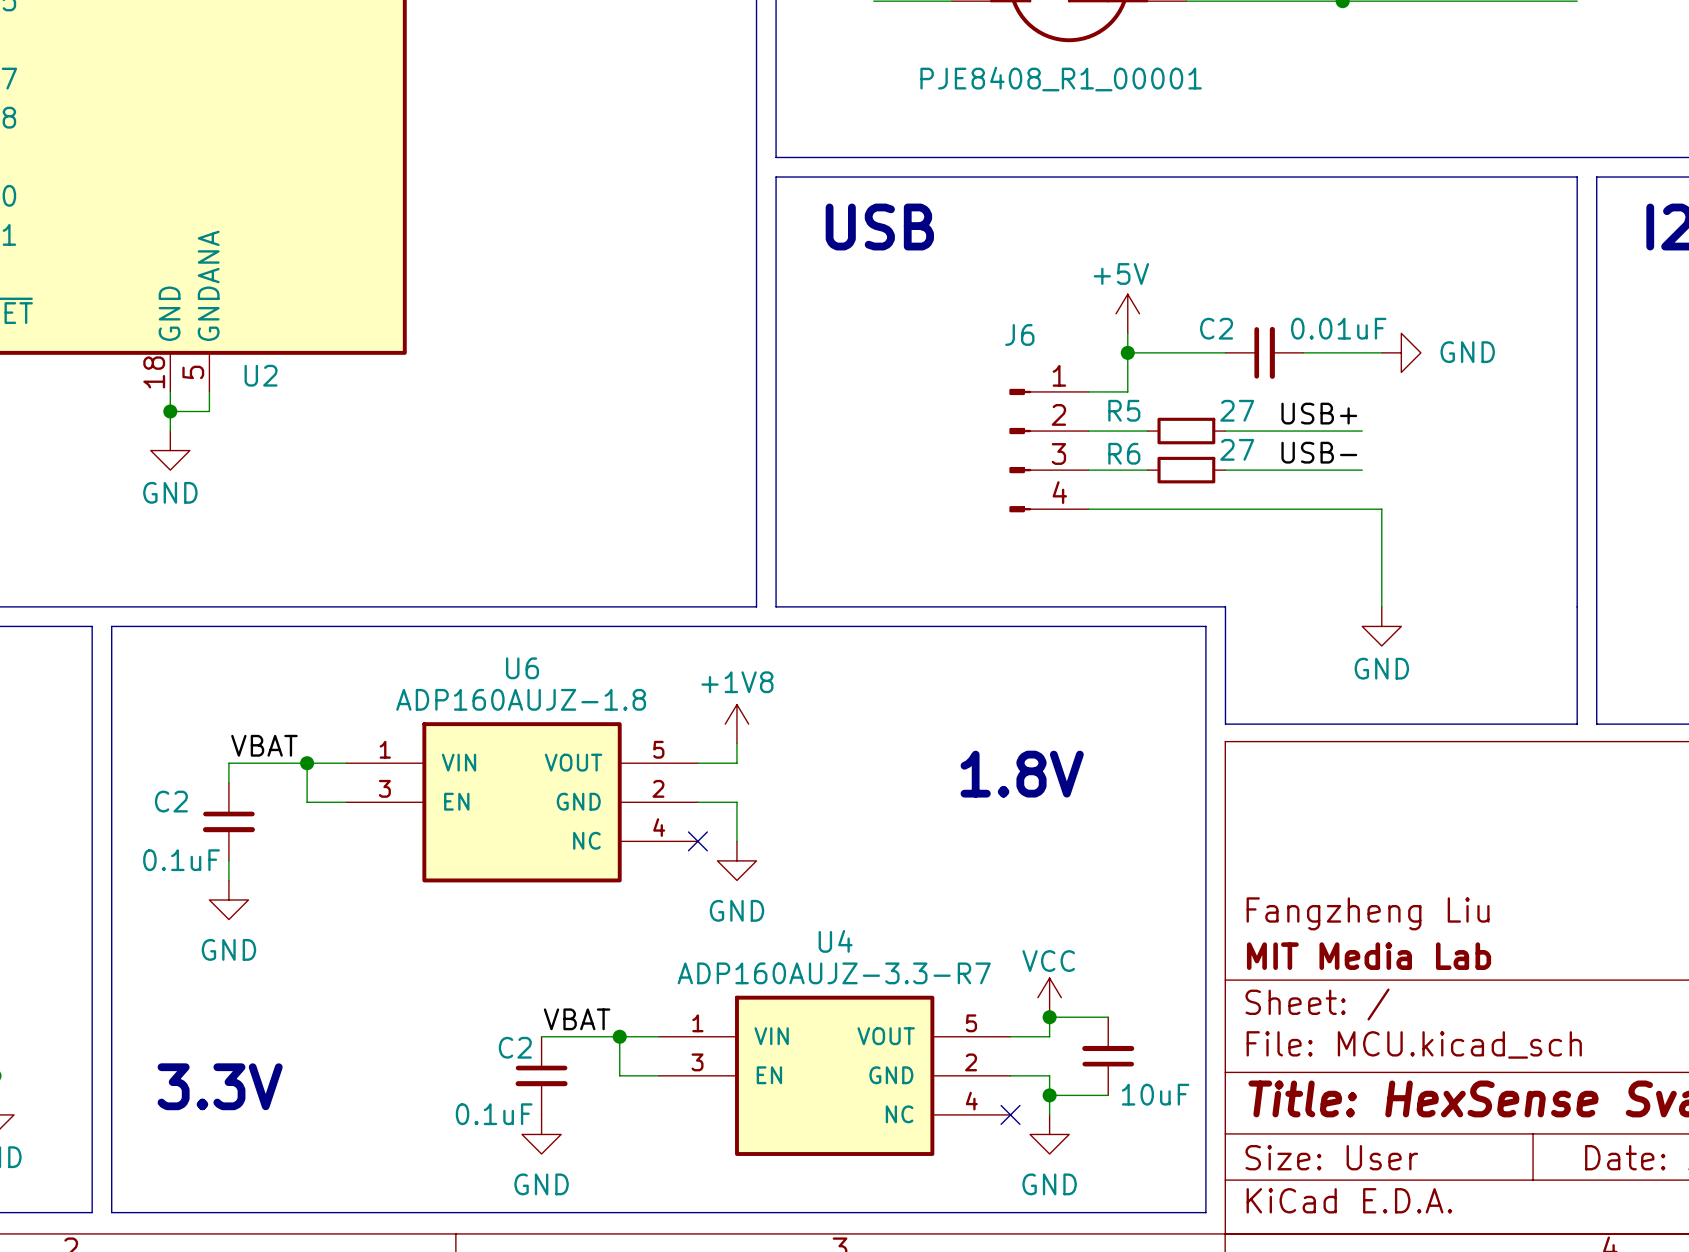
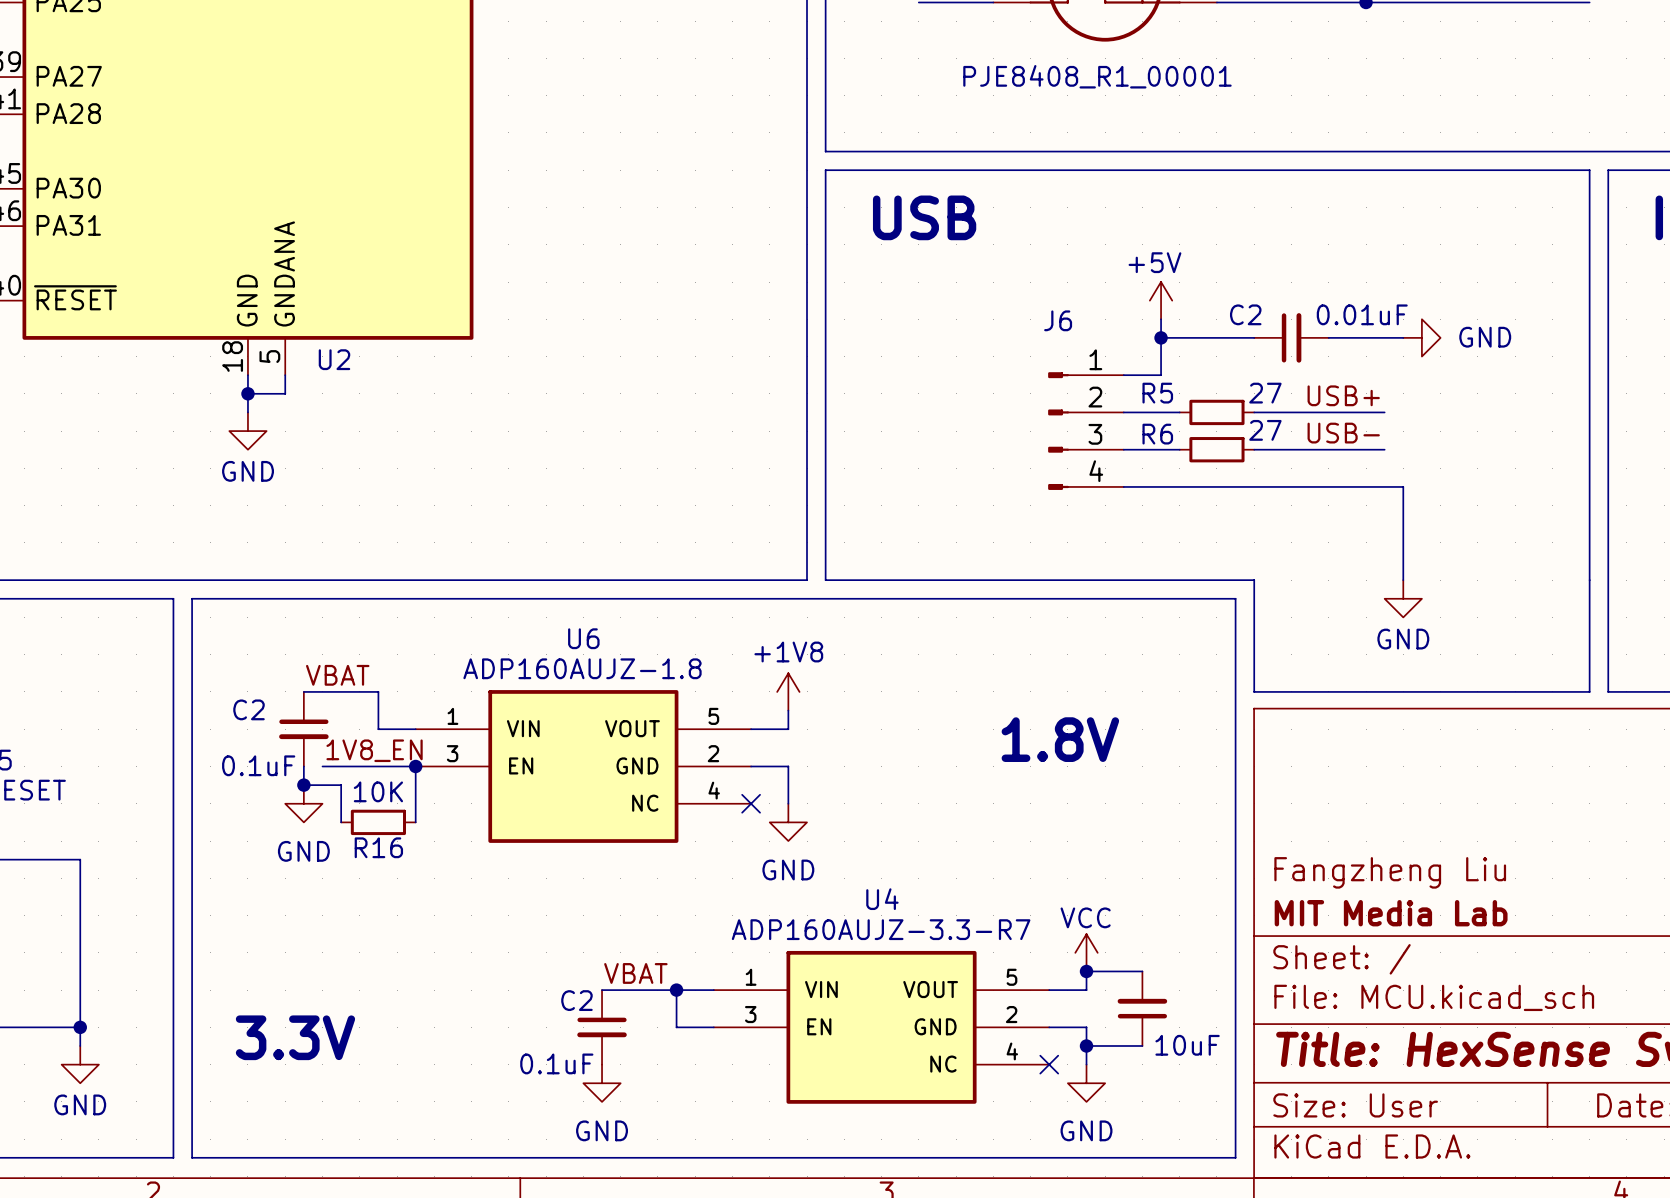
wire: none -> (303, 691) (378, 691) (378, 729)
label position: VBAT (264, 745) -> VBAT (337, 675)
junction: (307, 763) -> none
wire: (228, 782) (228, 763) (307, 763) (307, 802) -> (322, 766) (378, 766)
label: none -> 1V8_EN (374, 750)
wire: none -> (303, 766) (303, 785) (341, 785) (341, 822)
wire: none -> (415, 766) (415, 822)
junction: none -> (415, 766)
junction: none -> (303, 785)
C2 position: (228, 821) -> (303, 729)
wire: (228, 860) (228, 880) -> none
R16: none -> 10K (378, 822)
power symbol position: GND (228, 899) -> GND (303, 803)

